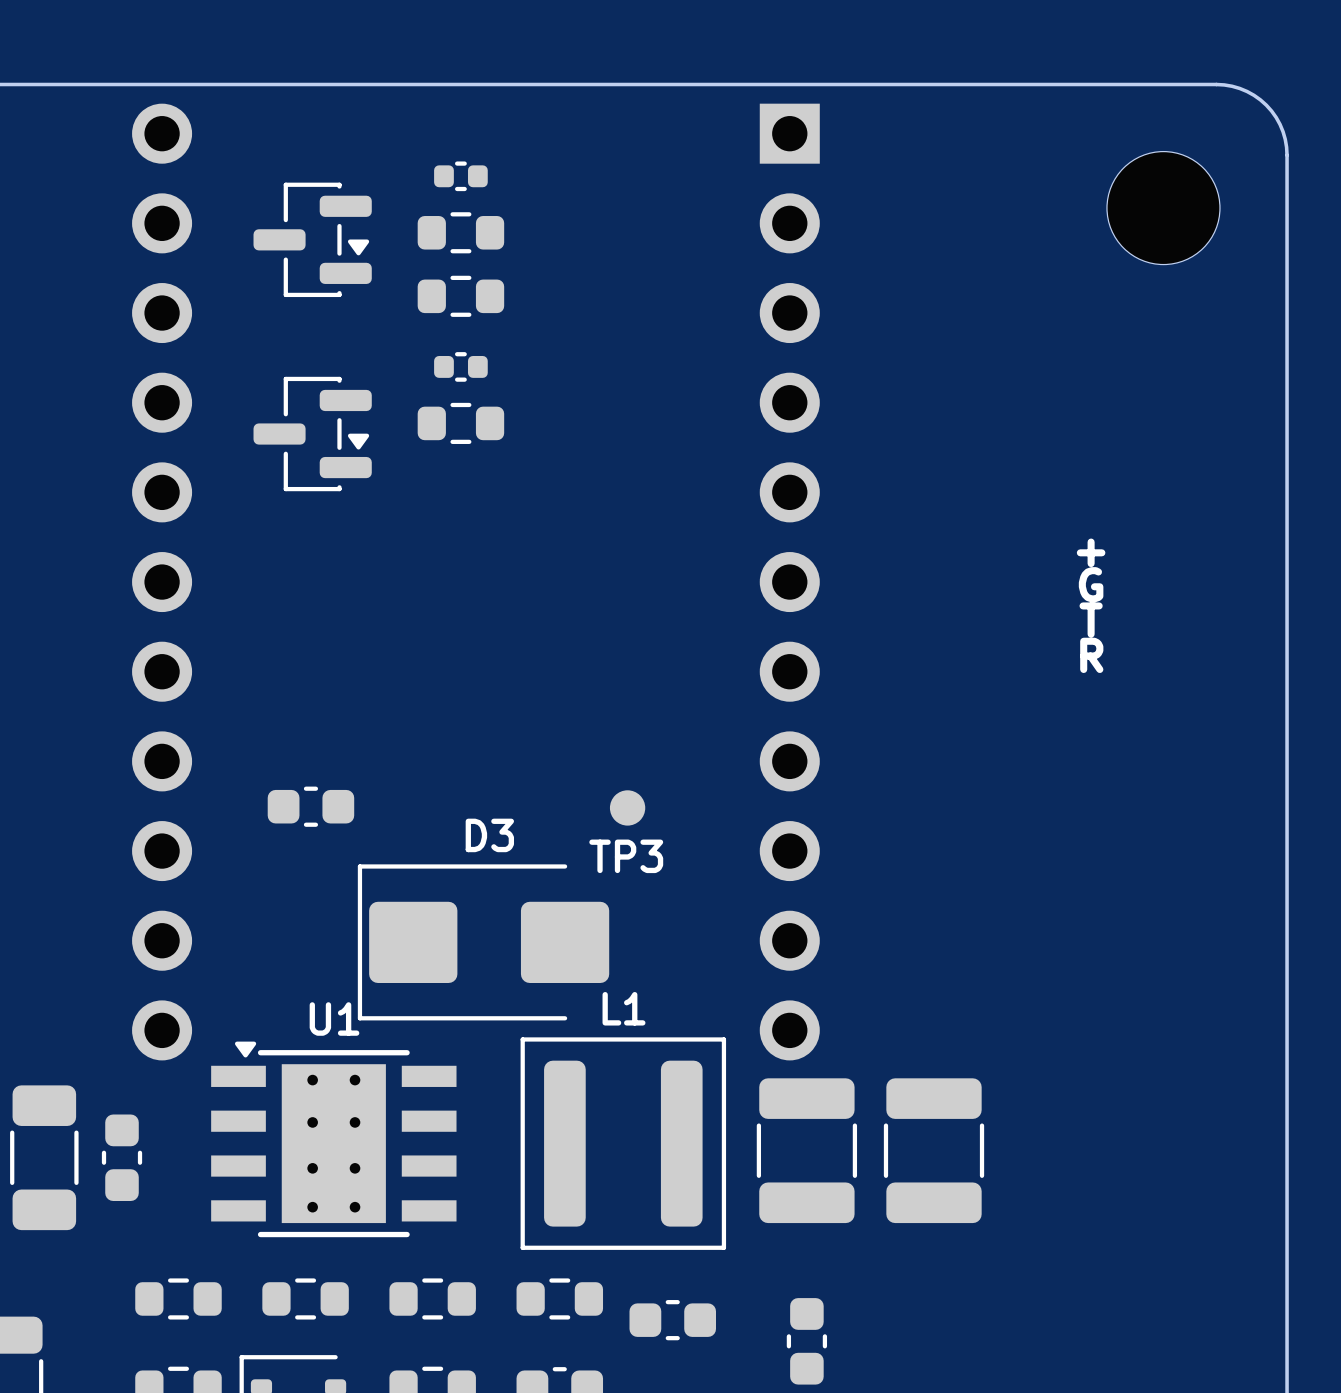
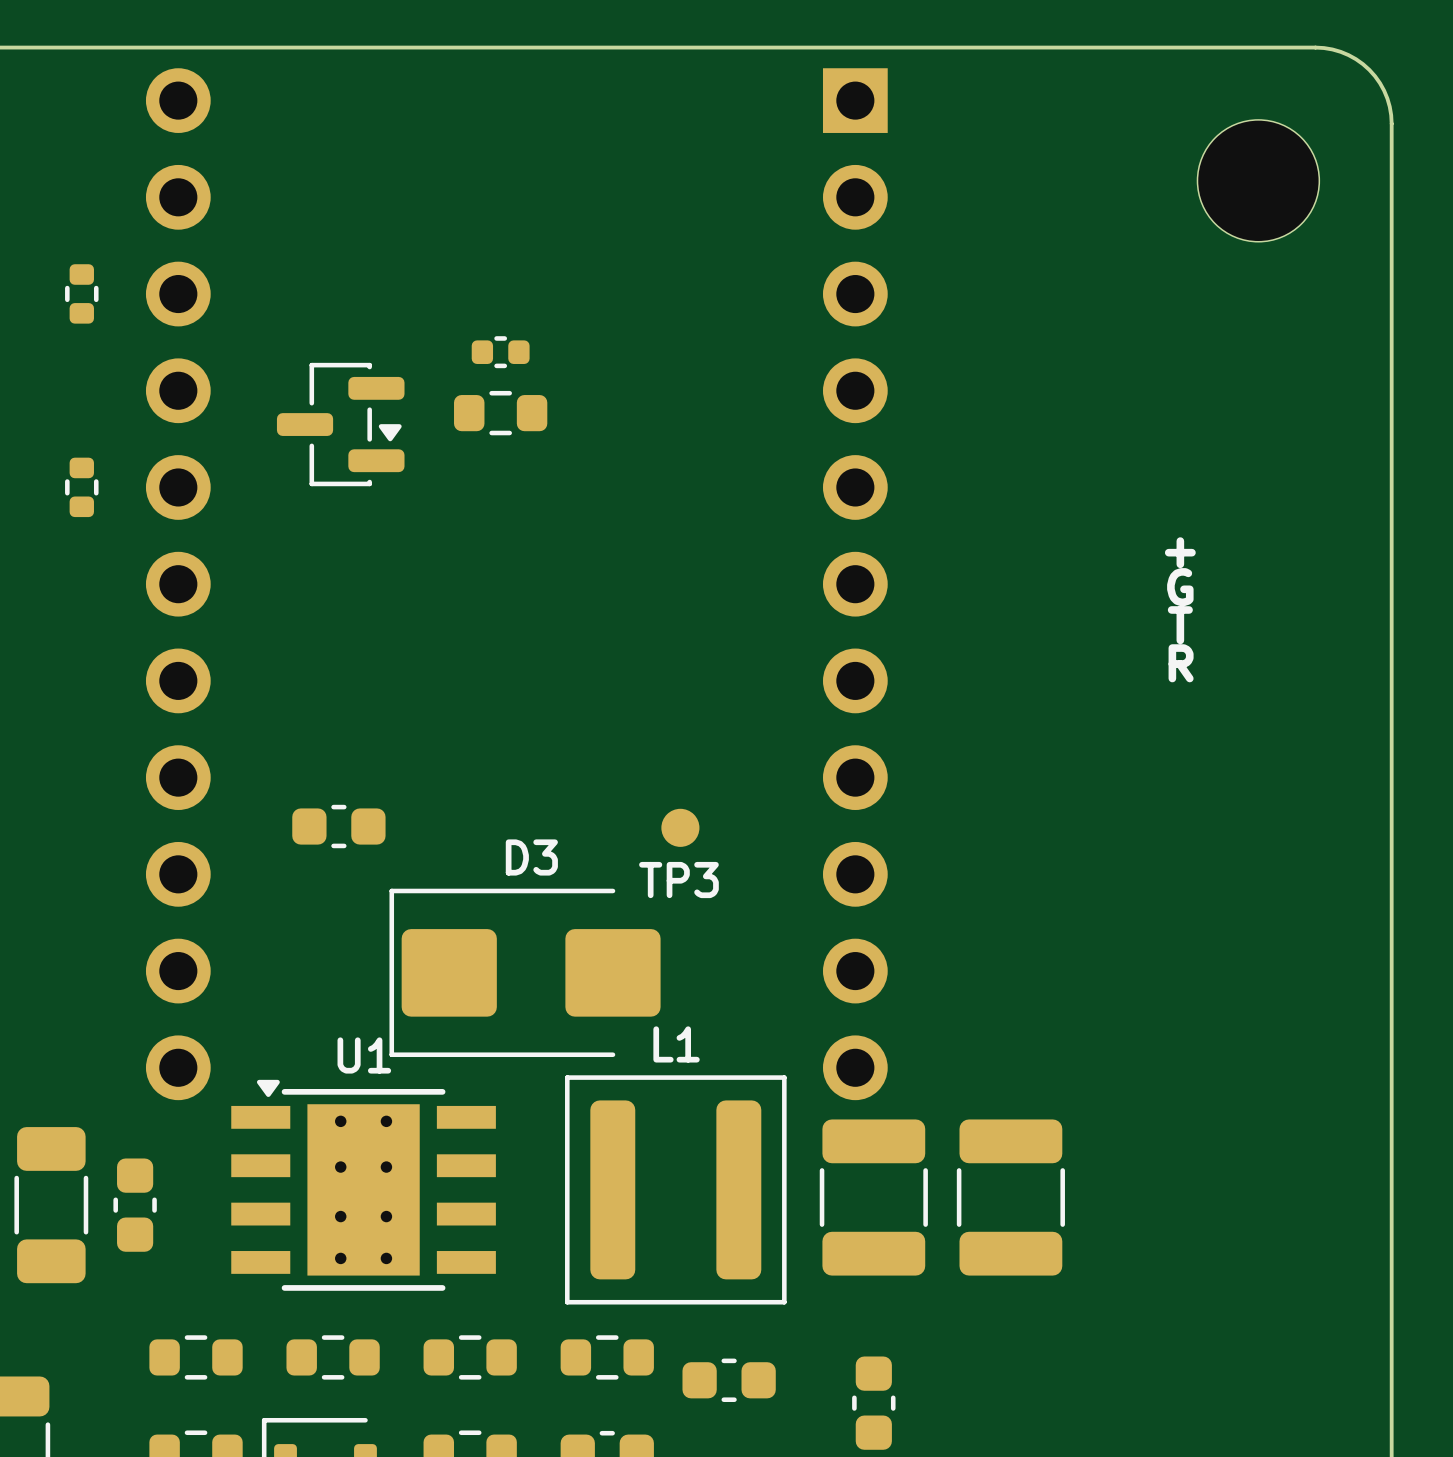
part: (460, 176) -> none
part: (460, 232) -> none
part: (312, 239) -> none
part: (460, 296) -> none
part: none -> (81, 293)
part: none -> (81, 487)

